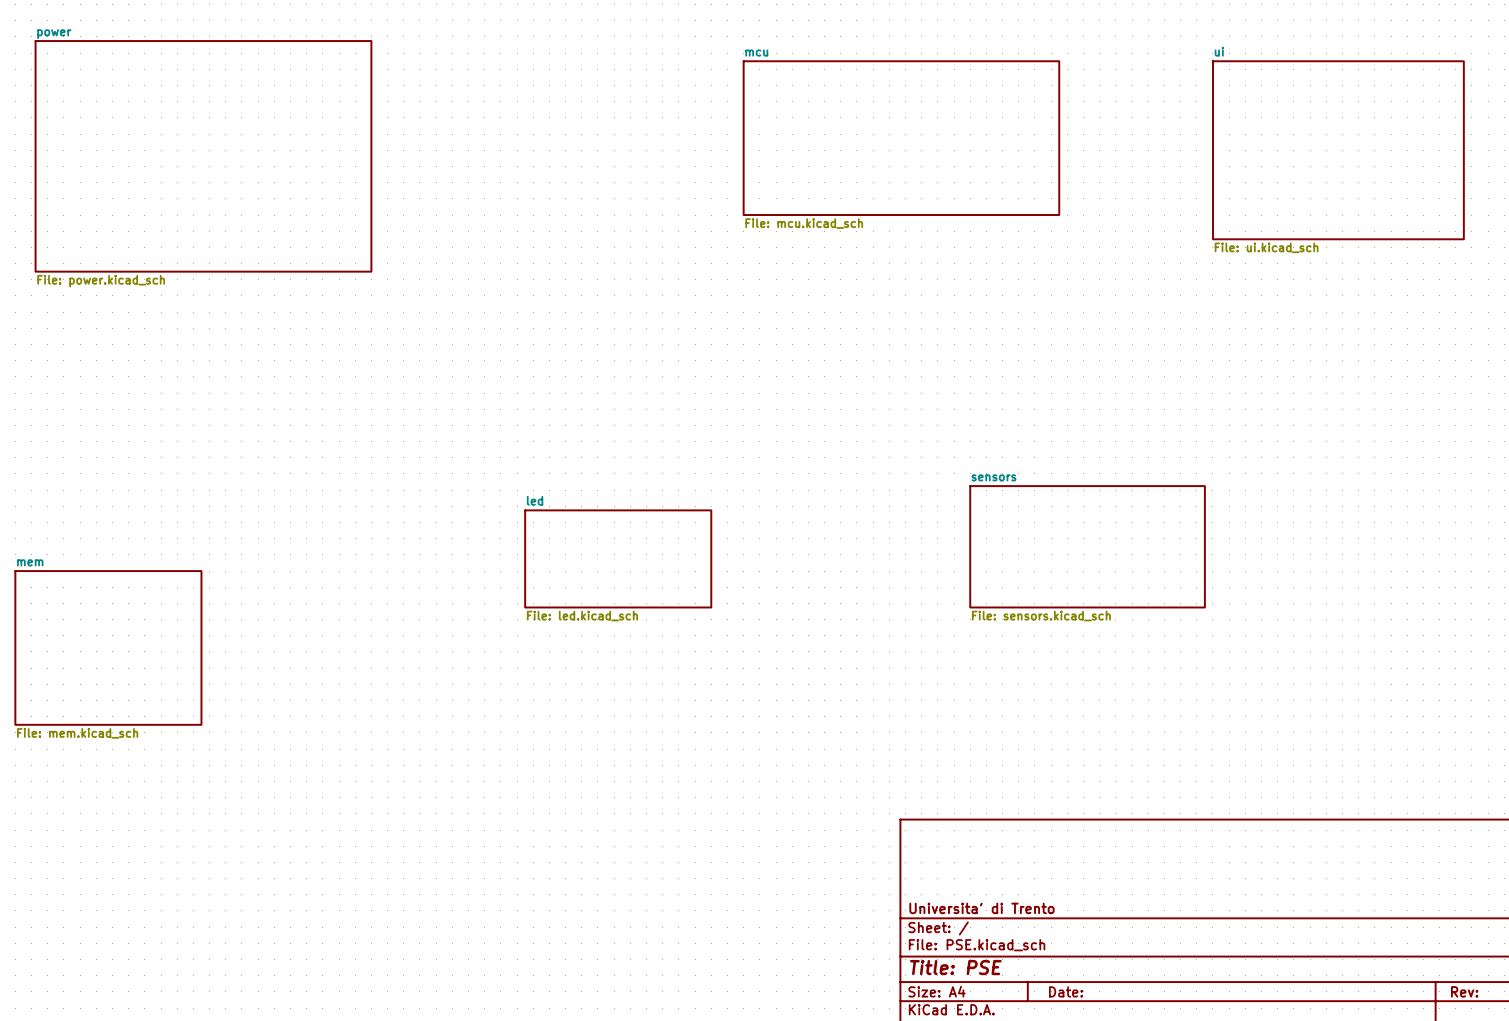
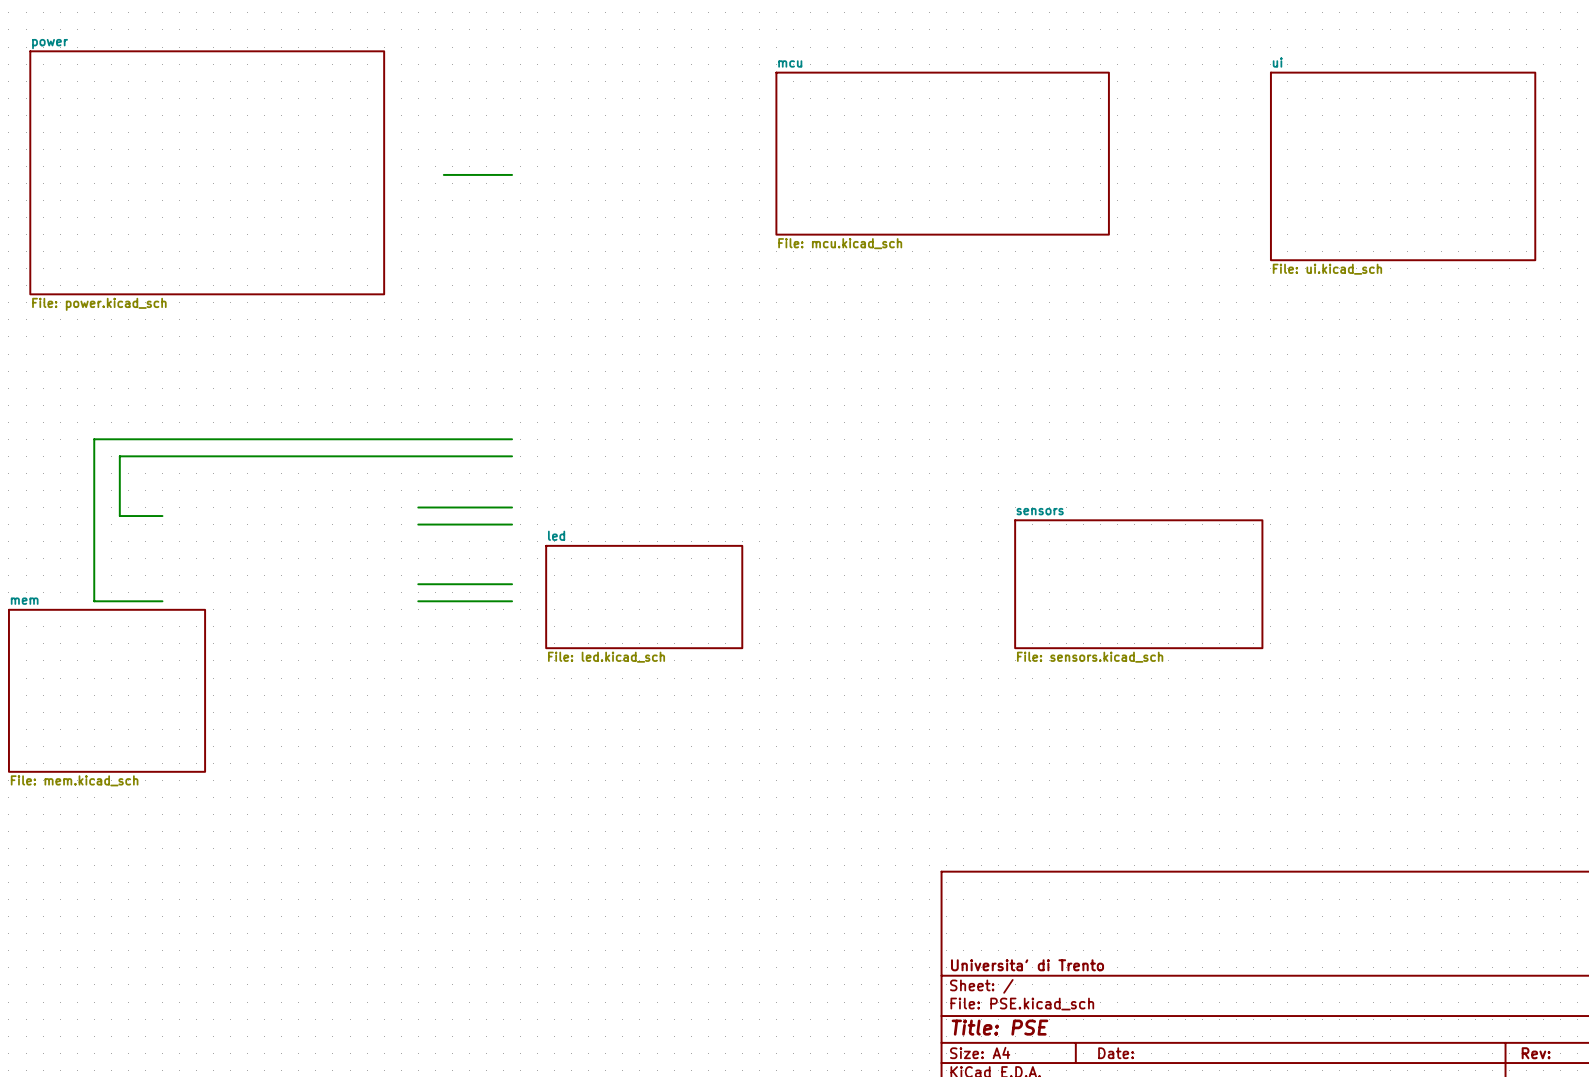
wire: none -> (443, 174) (512, 174)
wire: none -> (512, 439) (94, 439) (94, 601) (162, 601)
wire: none -> (512, 456) (119, 456) (119, 516) (162, 516)
wire: none -> (418, 507) (512, 507)
wire: none -> (418, 524) (512, 524)
wire: none -> (418, 584) (512, 584)
wire: none -> (418, 601) (512, 601)

